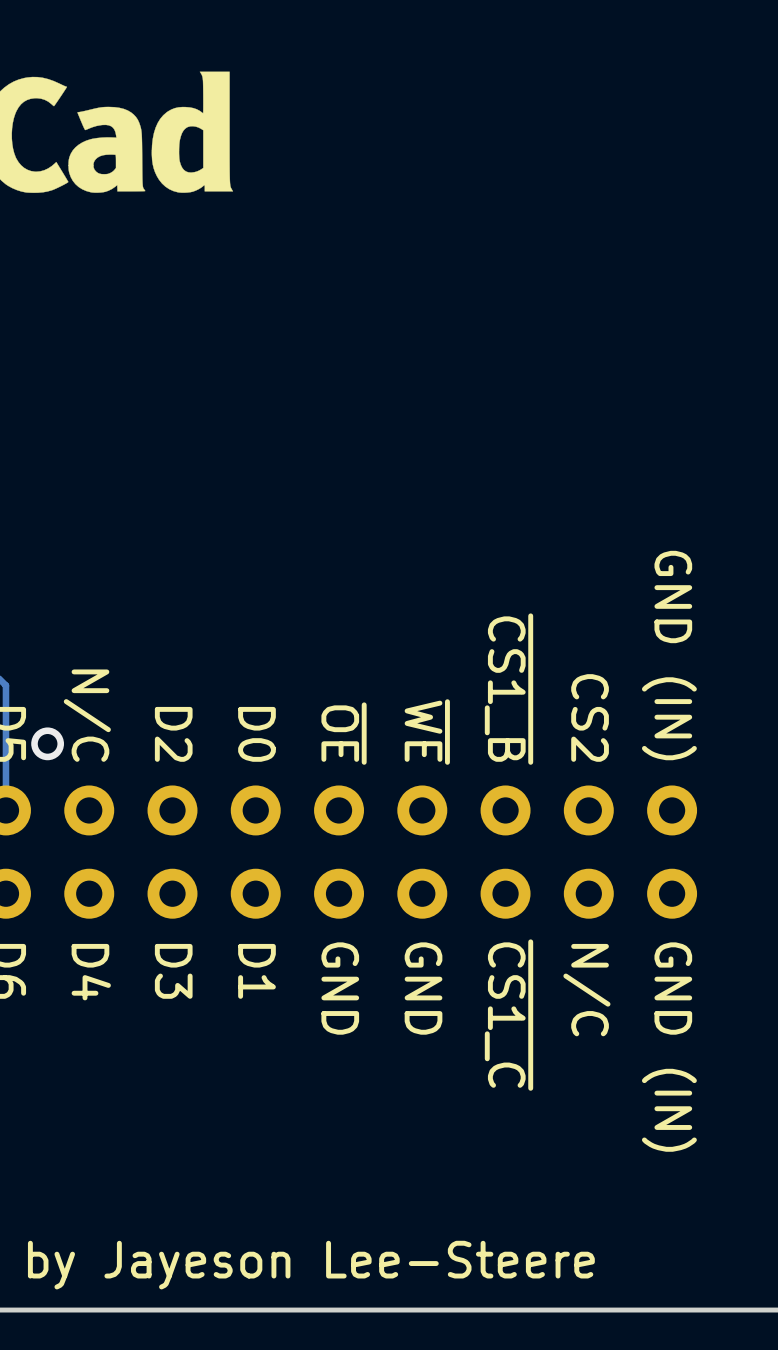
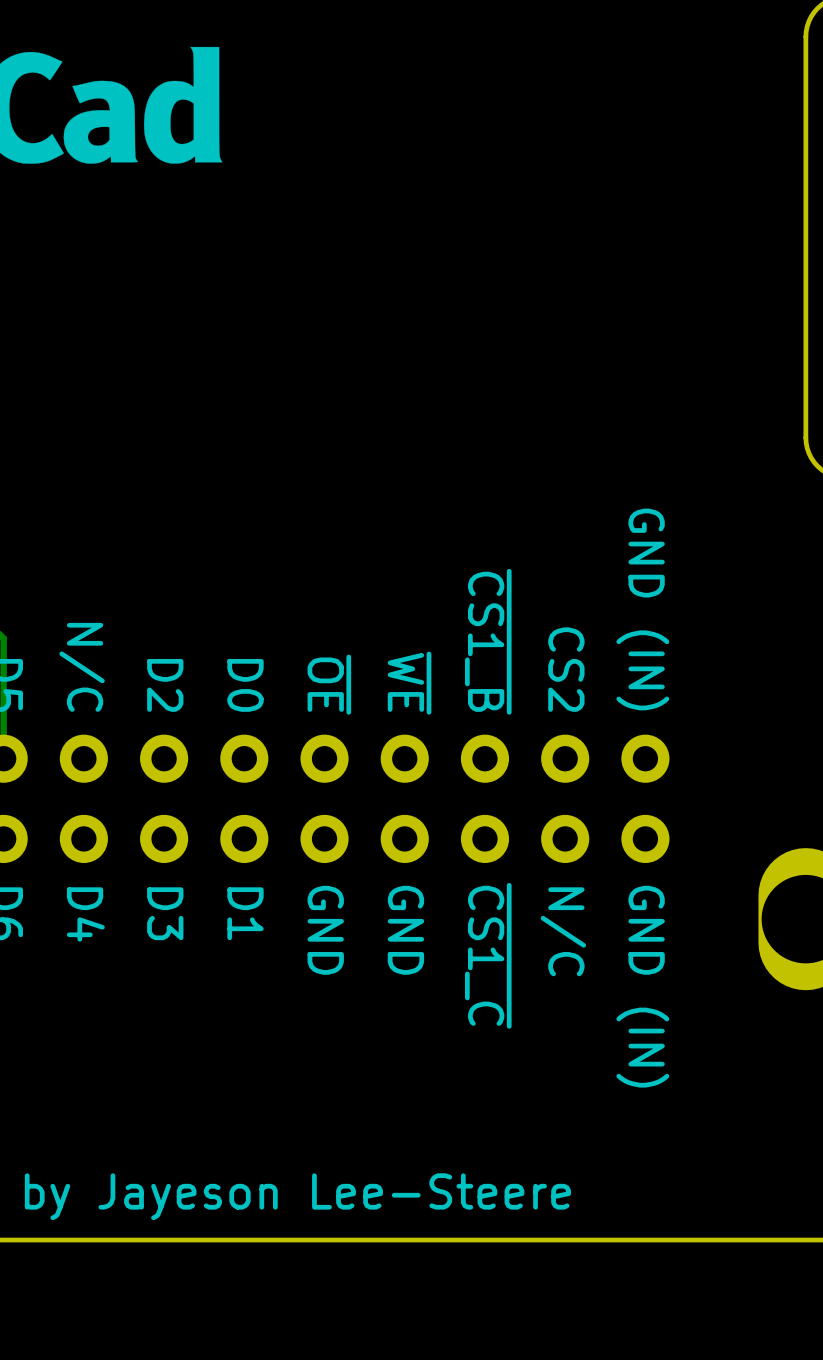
via: (47, 743) -> none

